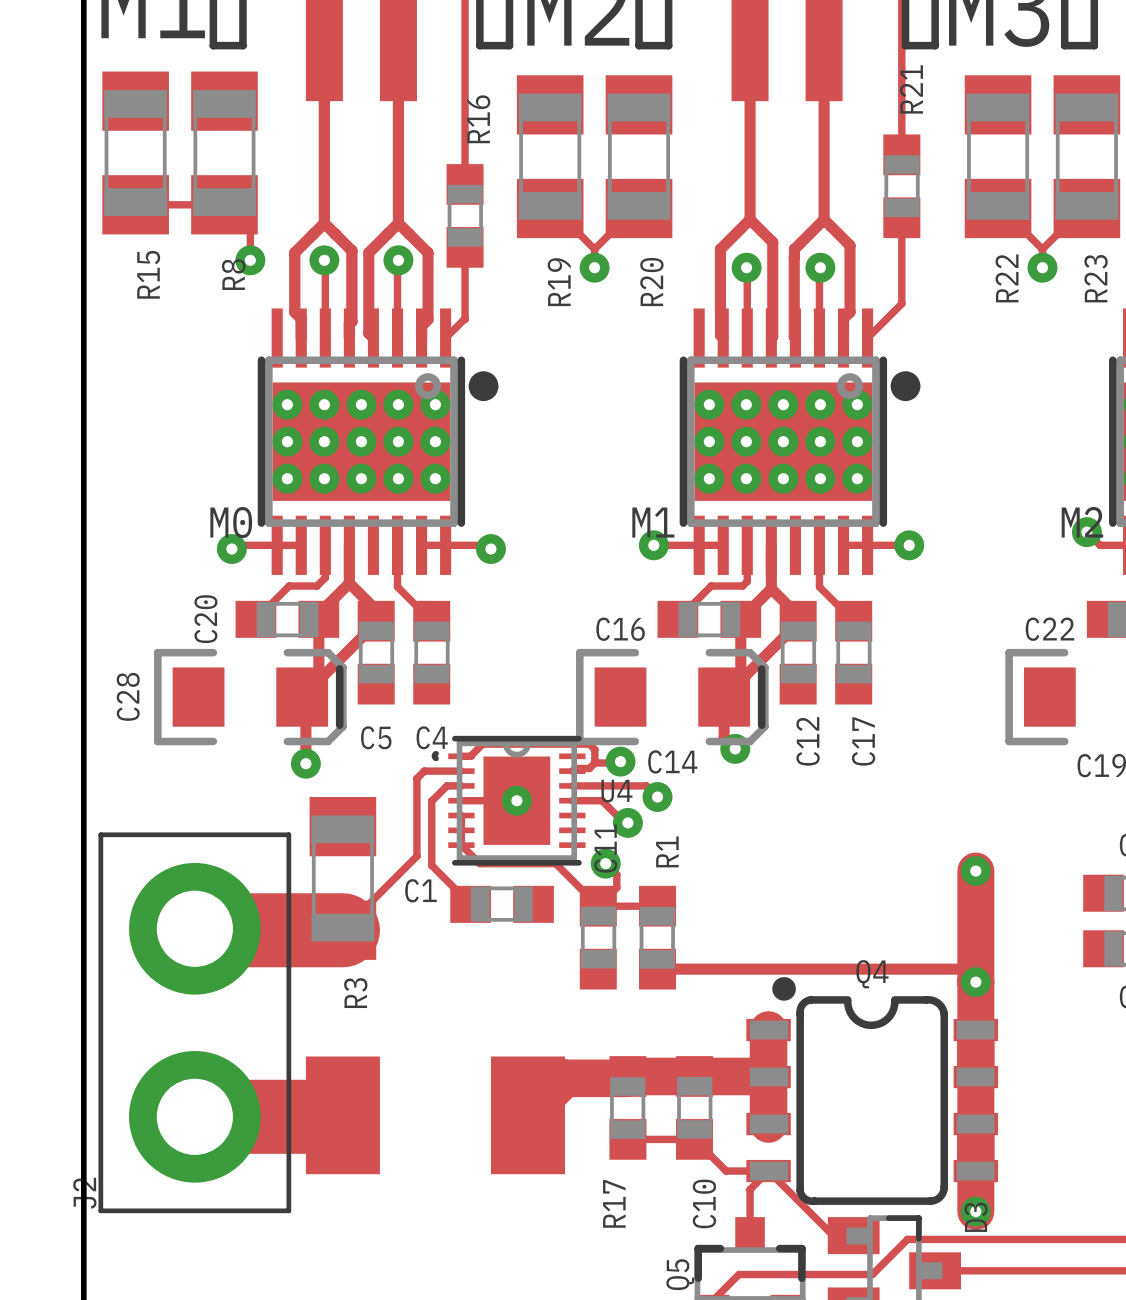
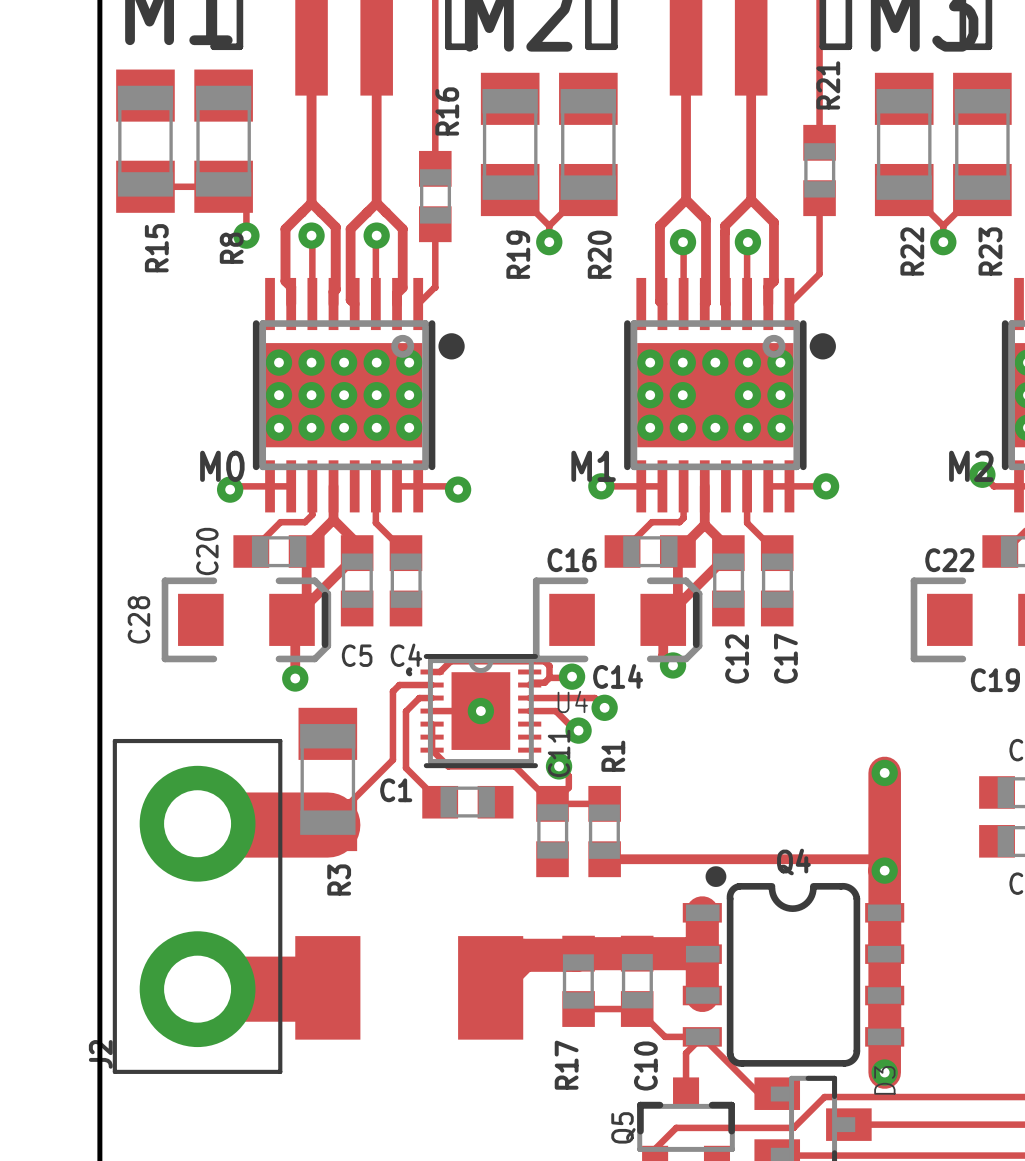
via: (783, 441) -> none

